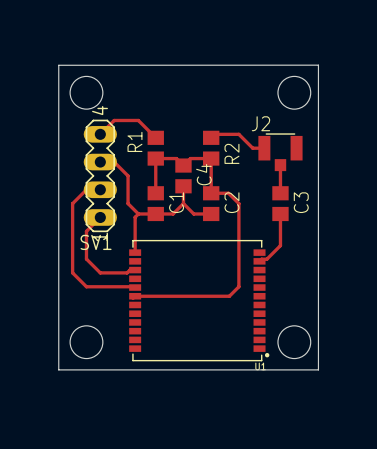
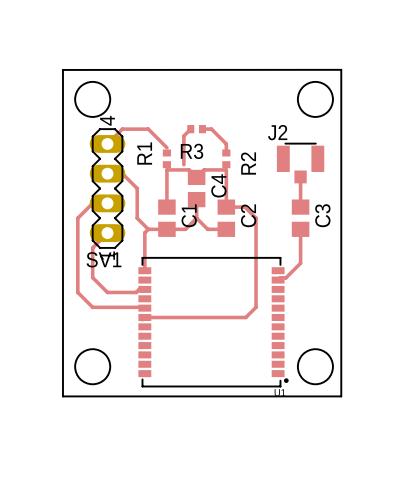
track: none -> (190, 129) (183, 136) (183, 164)
R3: none -> (196, 129)
track: none -> (202, 129) (211, 129) (226, 143) (226, 152)
R1 footprint: [147, 130, 164, 166] -> [162, 149, 172, 169]
R2 footprint: [203, 130, 220, 166] -> [222, 149, 231, 169]
track: (211, 137) (214, 134) (238, 134) (252, 148) (264, 148) -> none

